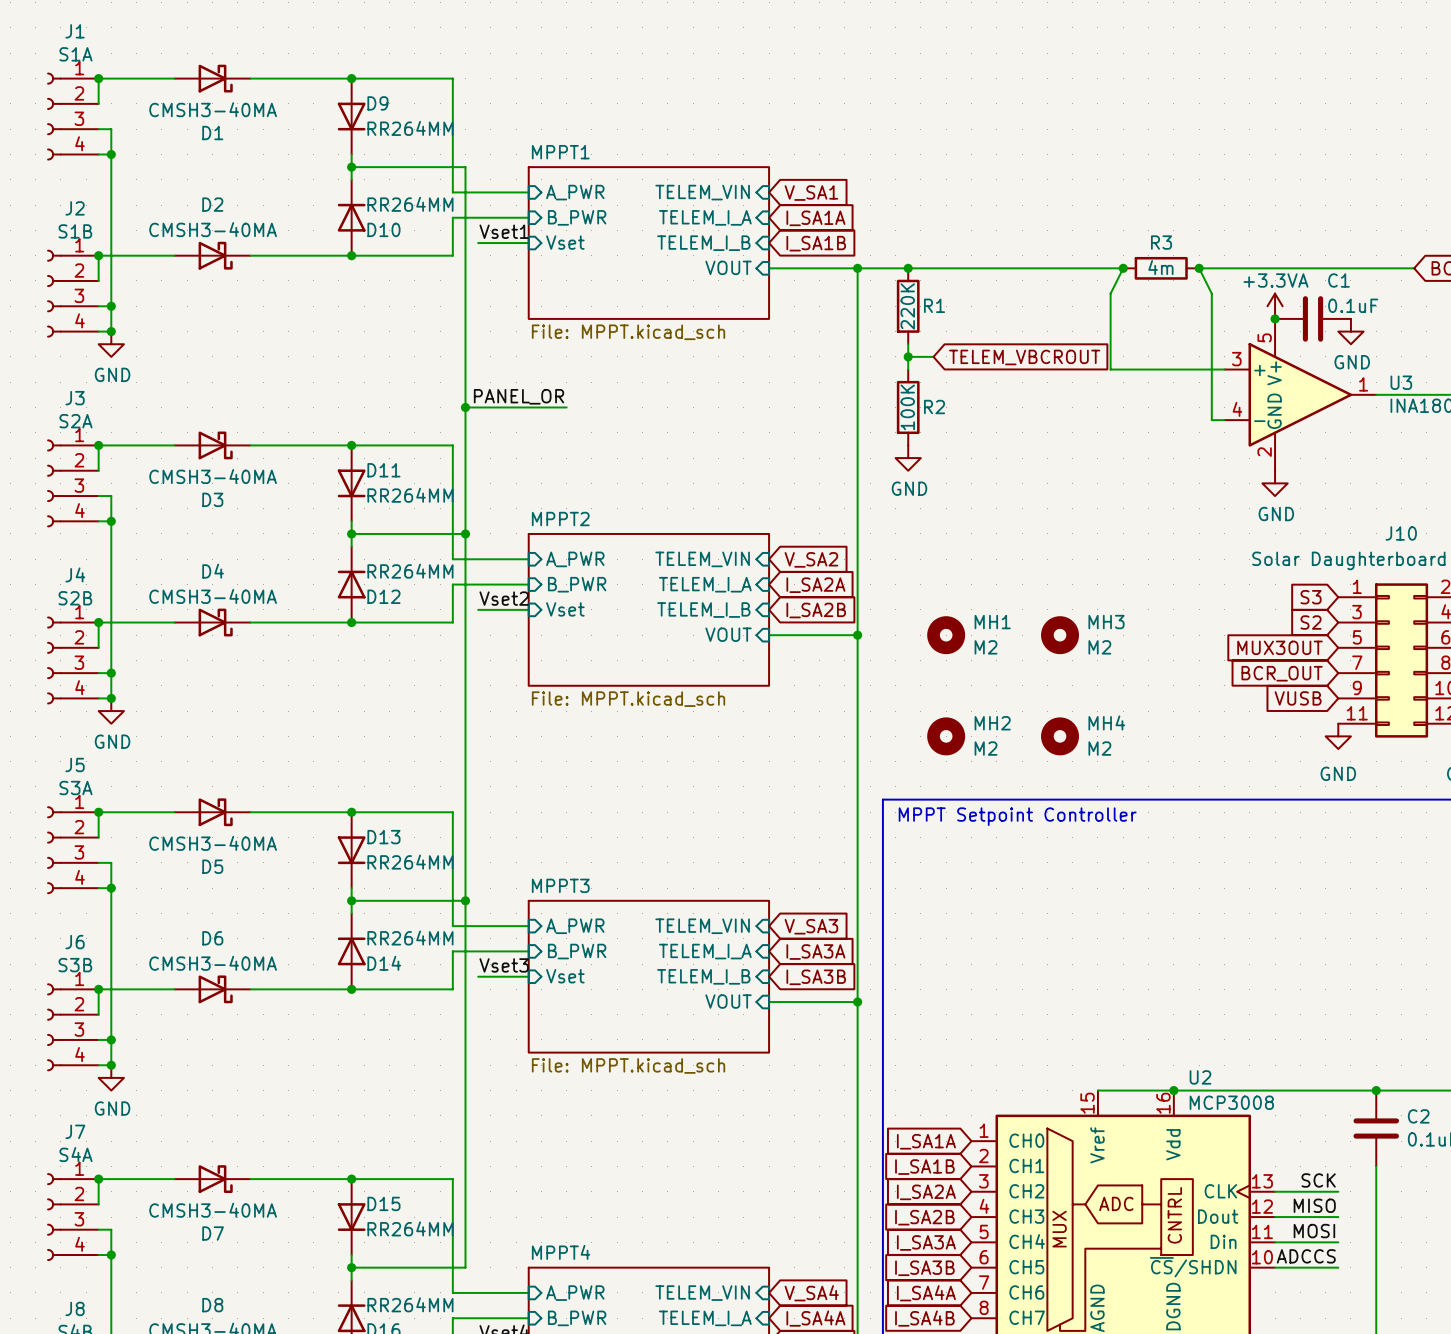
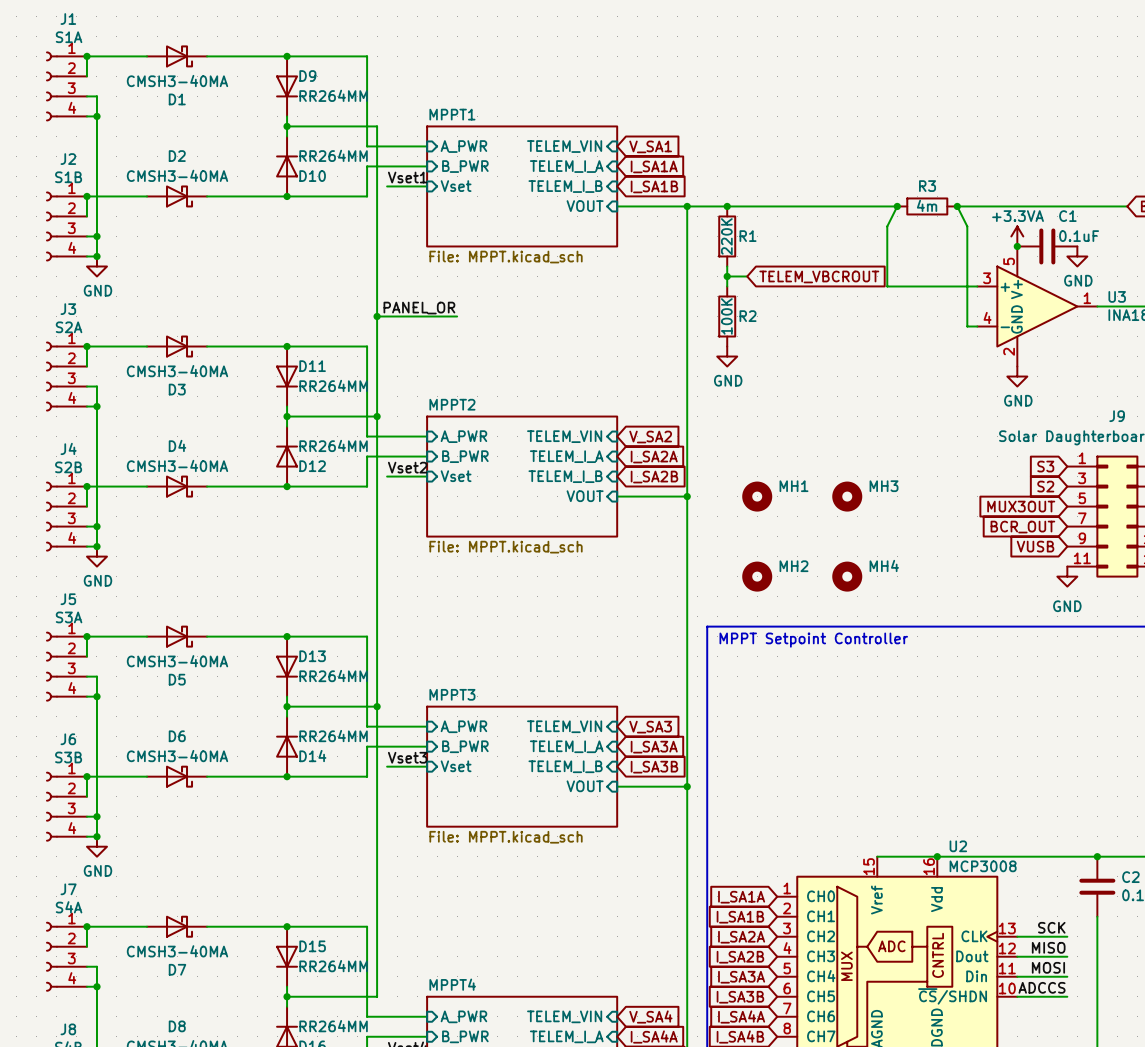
J10 name: J10 (1401, 533) -> J9 (1117, 416)
MH1 value: M2 (986, 647) -> none
MH3 value: M2 (1099, 647) -> none
MH2 value: M2 (986, 748) -> none
MH4 value: M2 (1099, 748) -> none

